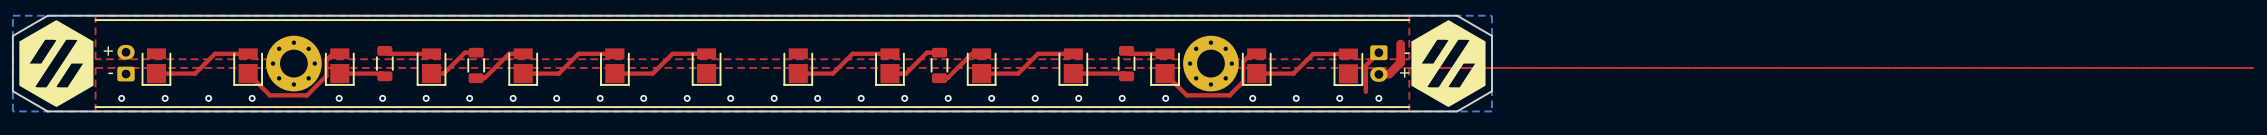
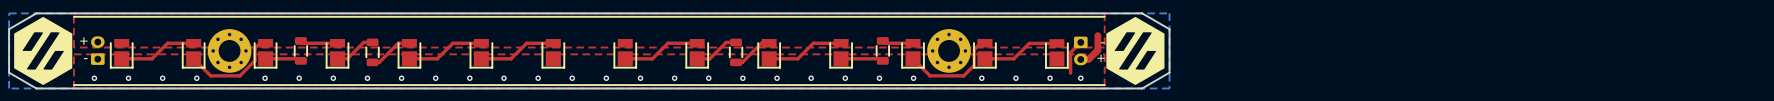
top zone outline: (1409, 67) (2253, 67) -> none

